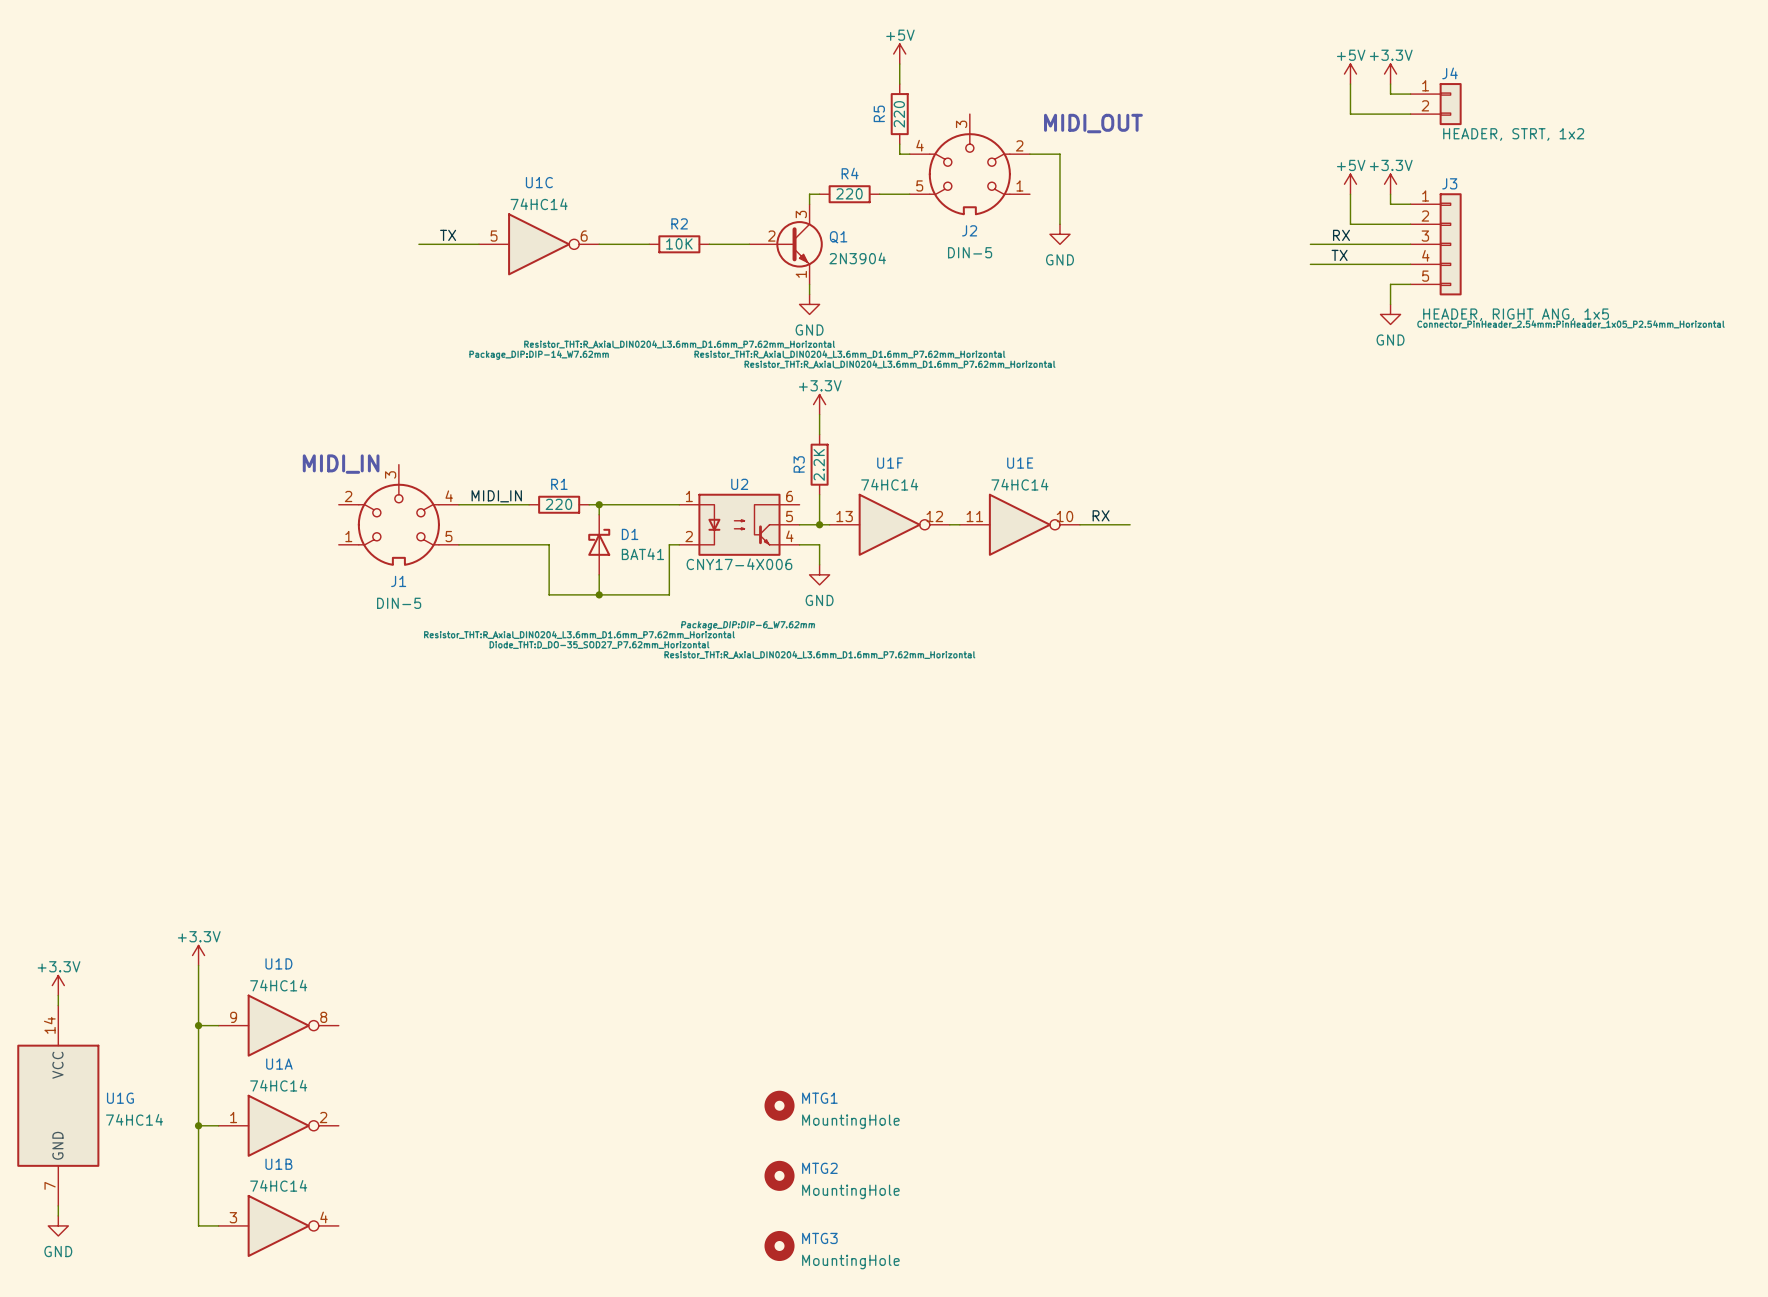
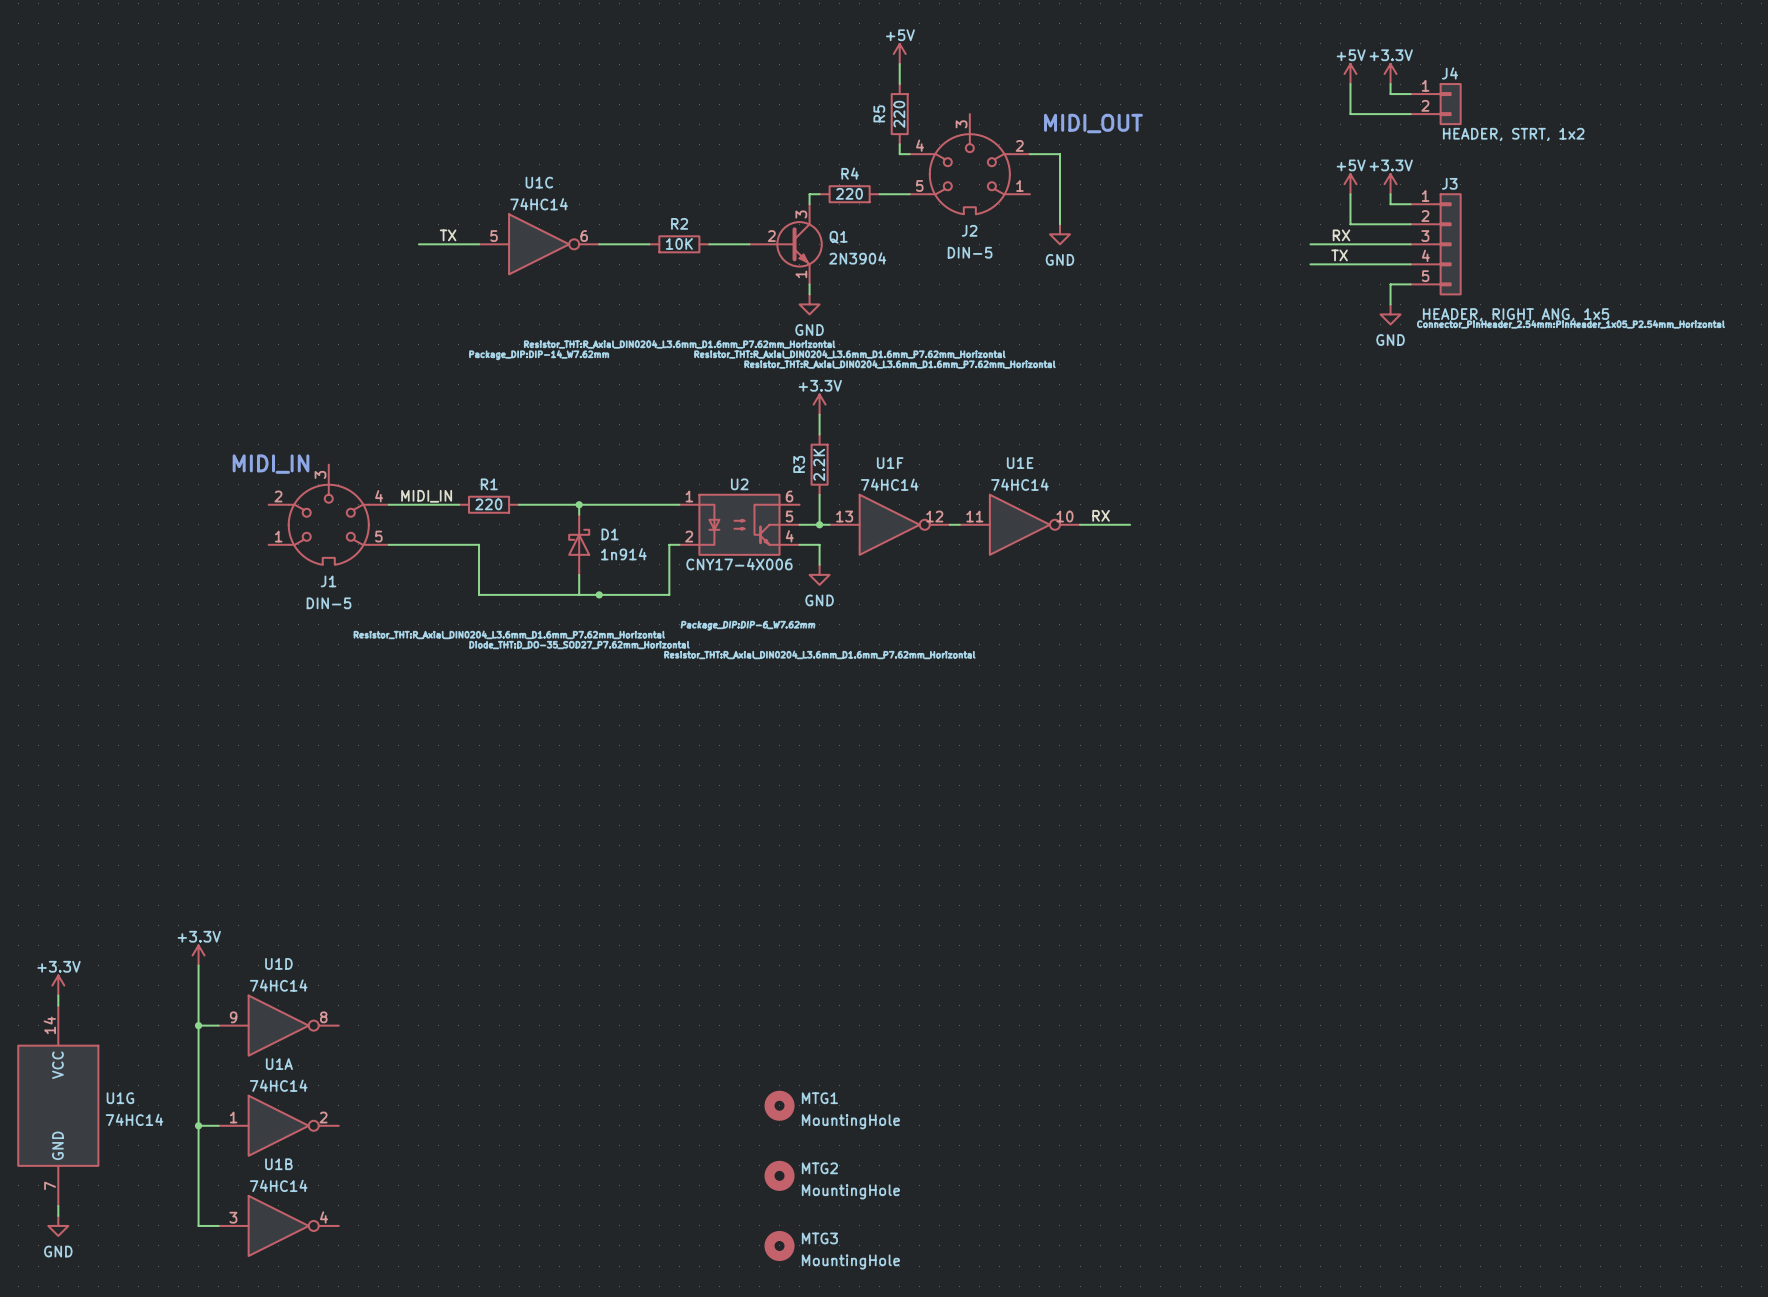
text position: MIDI_IN (341, 464) -> MIDI_IN (271, 464)
label position: MIDI_IN (496, 496) -> MIDI_IN (426, 496)
wire: (458, 504) (519, 504) -> (458, 504) (388, 504)
R1 position: (559, 504) -> (489, 504)
junction position: (599, 504) -> (579, 504)
J1 position: (398, 515) -> (328, 515)
wire: none -> (388, 544) (458, 544)
wire: (479, 544) (549, 544) (549, 594) -> (479, 544) (479, 594) (549, 594)
D1 position: (599, 544) -> (579, 544)
D1 value: BAT41 (642, 554) -> 1n914 (623, 554)
wire: (599, 574) (599, 594) -> (579, 574) (579, 594)

